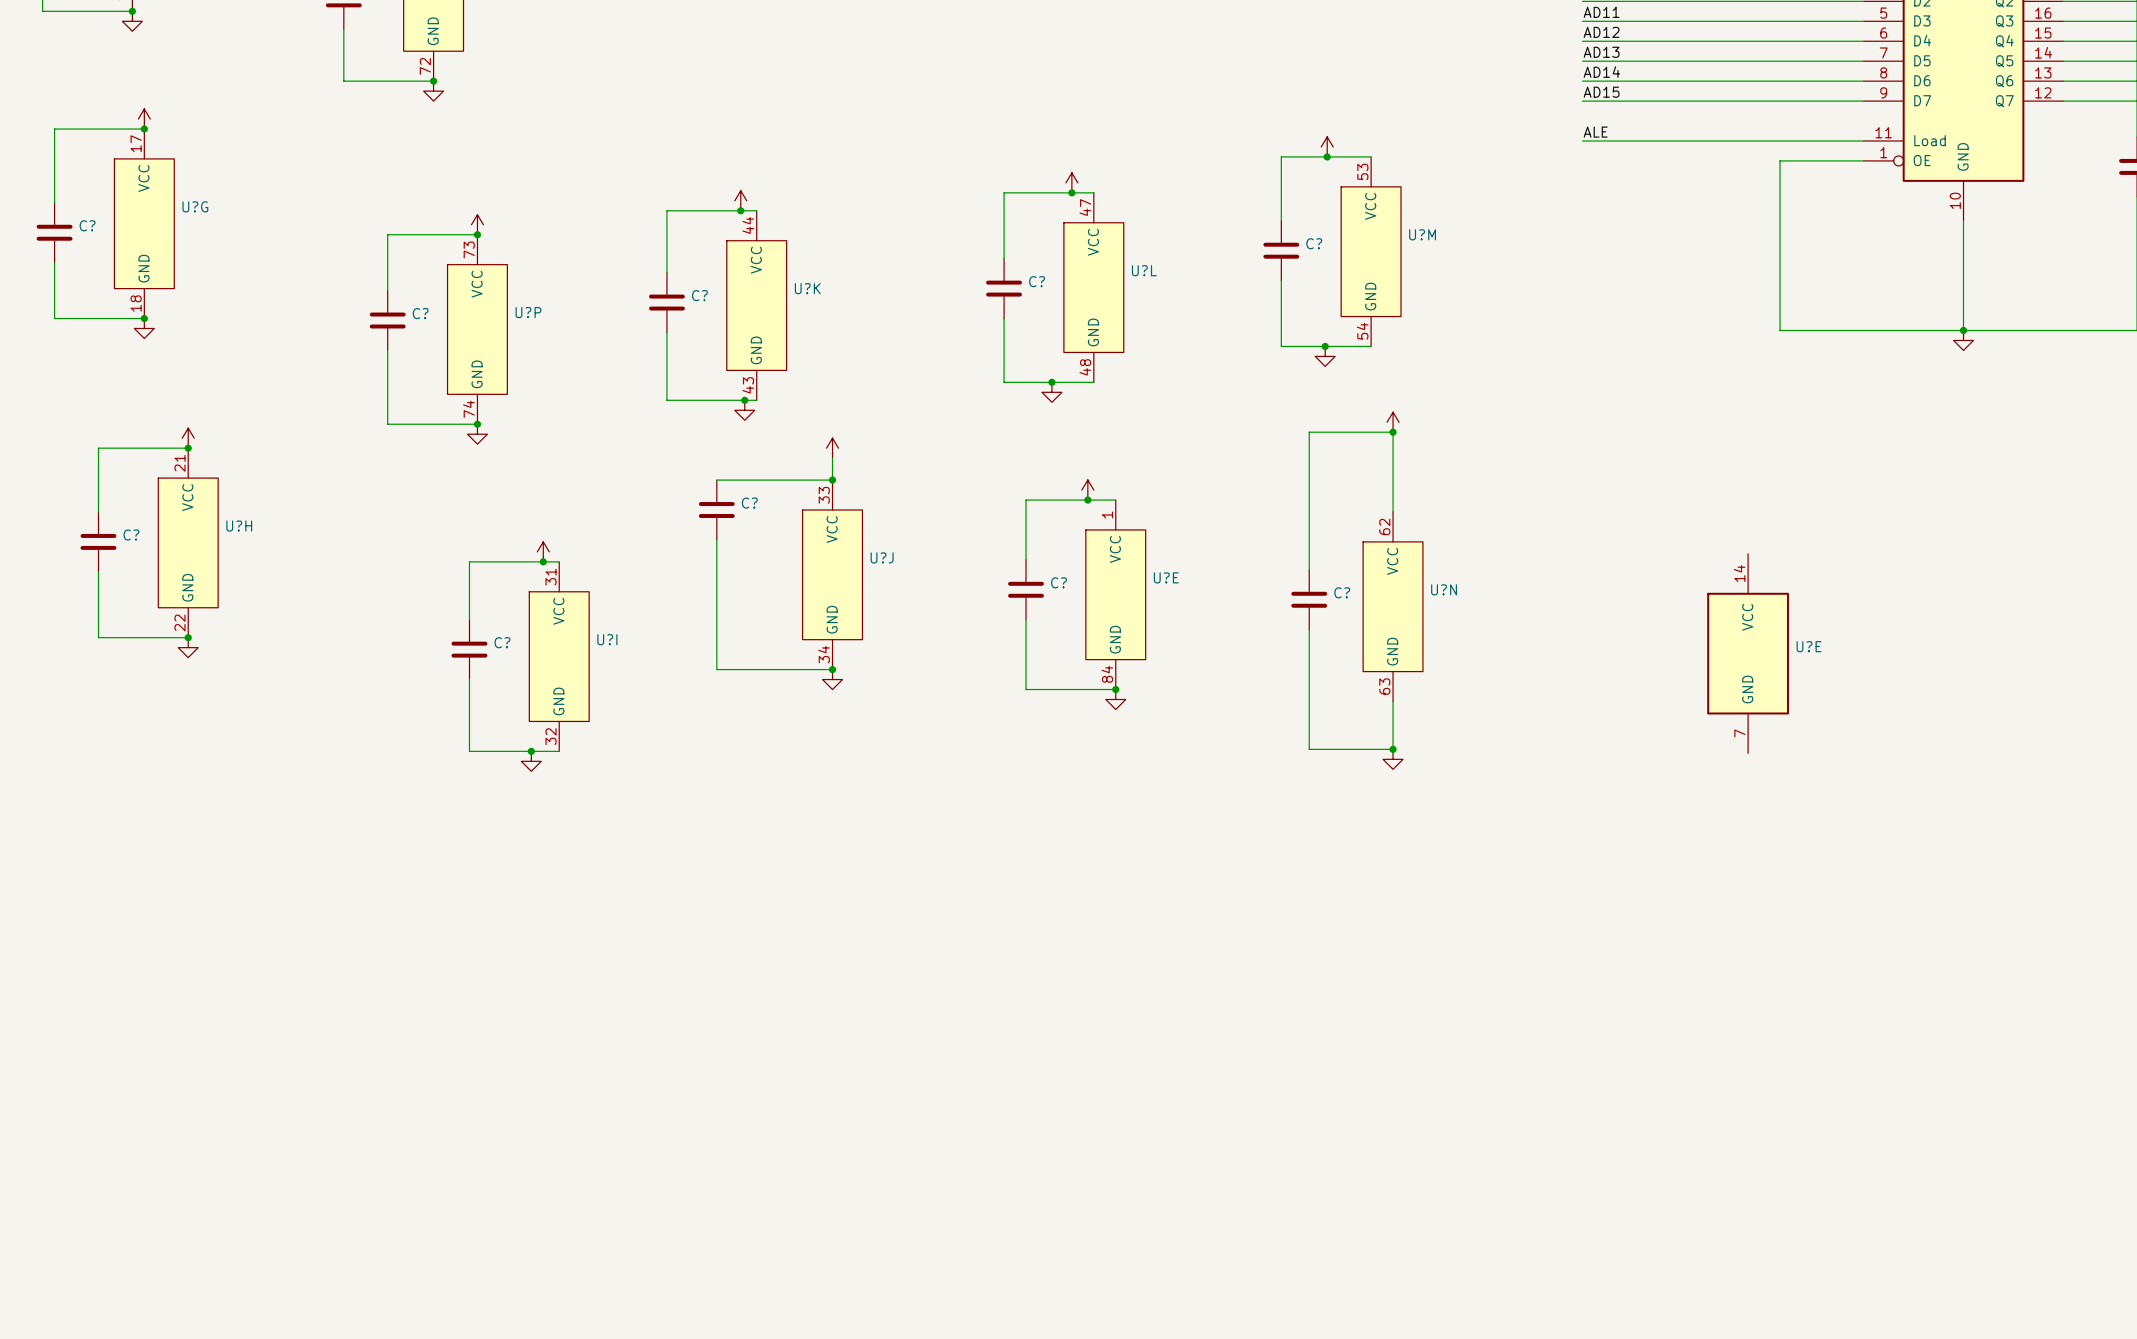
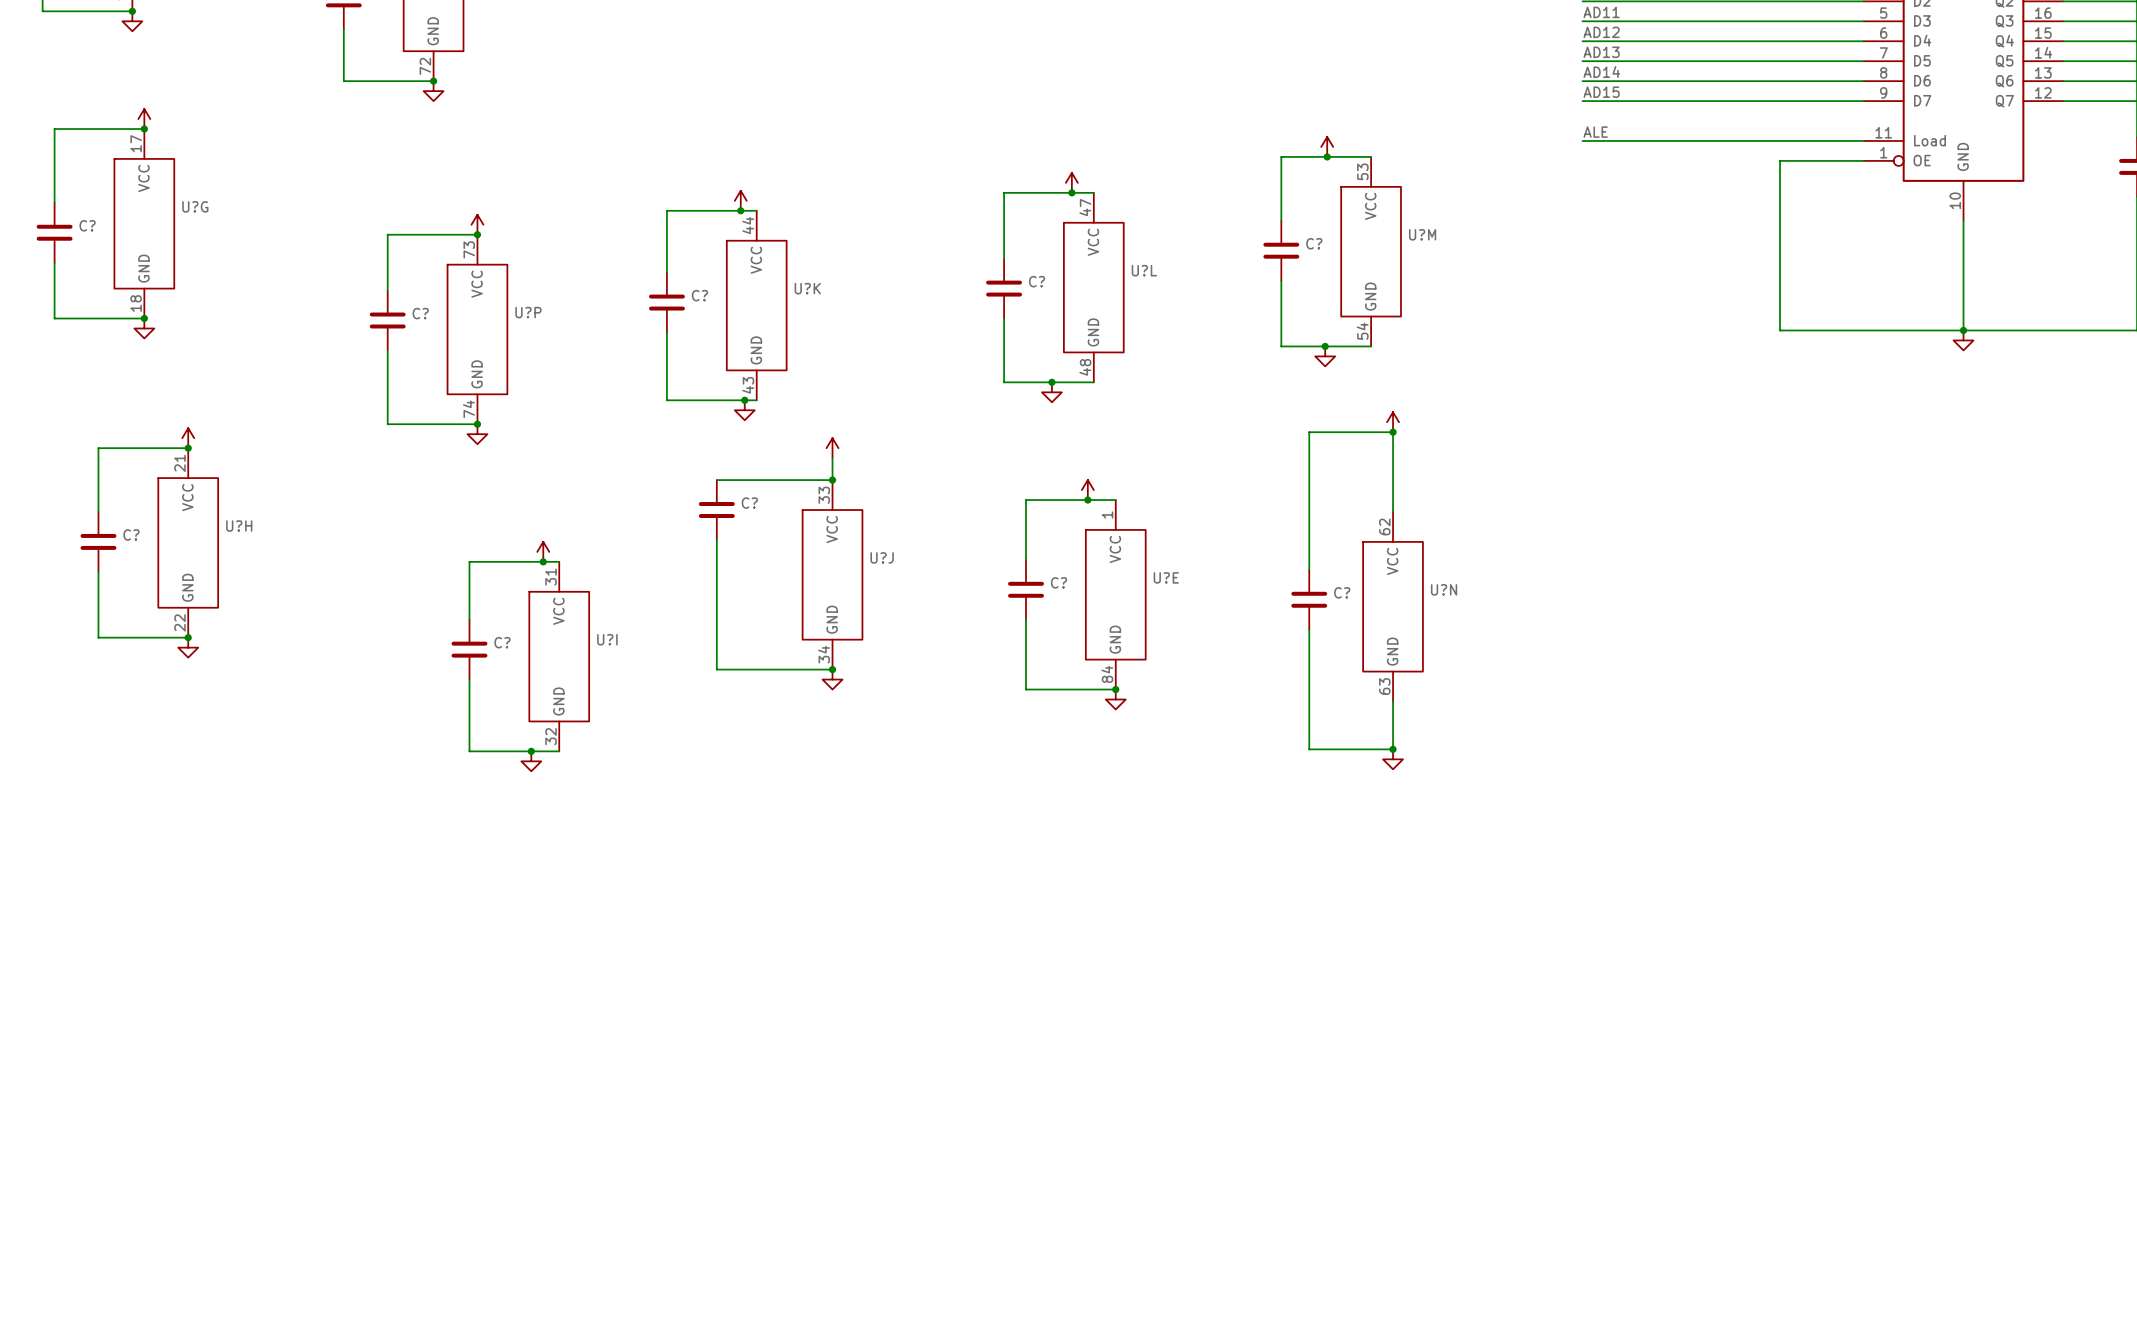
U?E: (1748, 653) -> none

